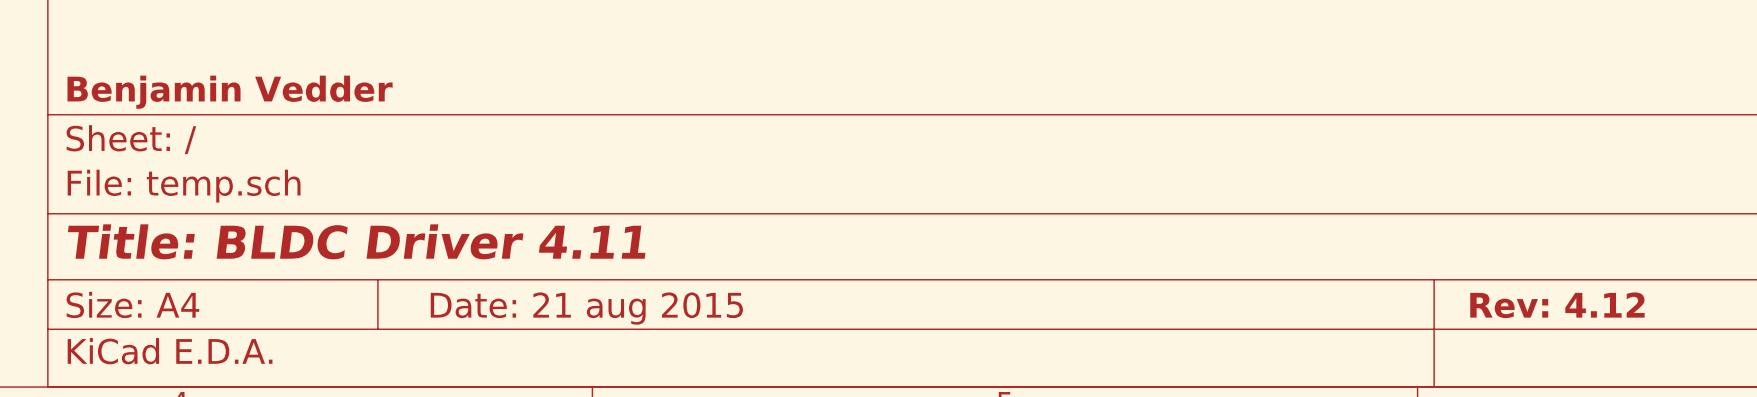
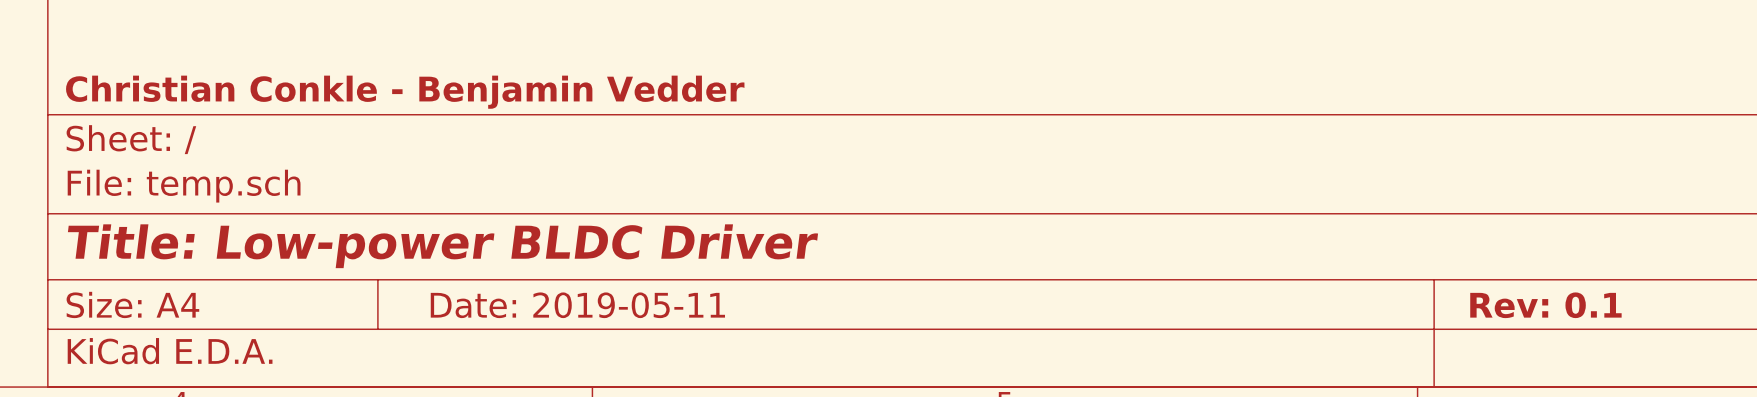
title block: Benjamin Vedder (230, 92) -> Christian Conkle - Benjamin Vedder (405, 92)
title block: Title: BLDC Driver 4.11 (356, 241) -> Title: Low-power BLDC Driver (442, 246)
title block: Rev: 4.12 (1557, 305) -> Rev: 0.1 (1545, 305)
title block: Date: 21 aug 2015 (586, 308) -> Date: 2019-05-11 (577, 305)

